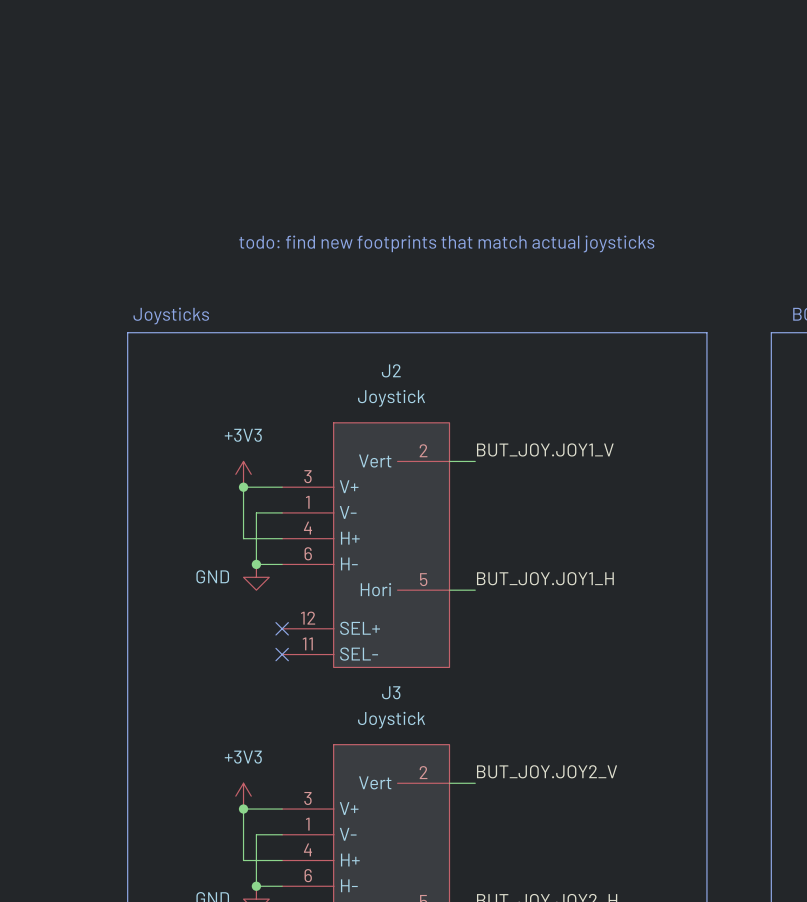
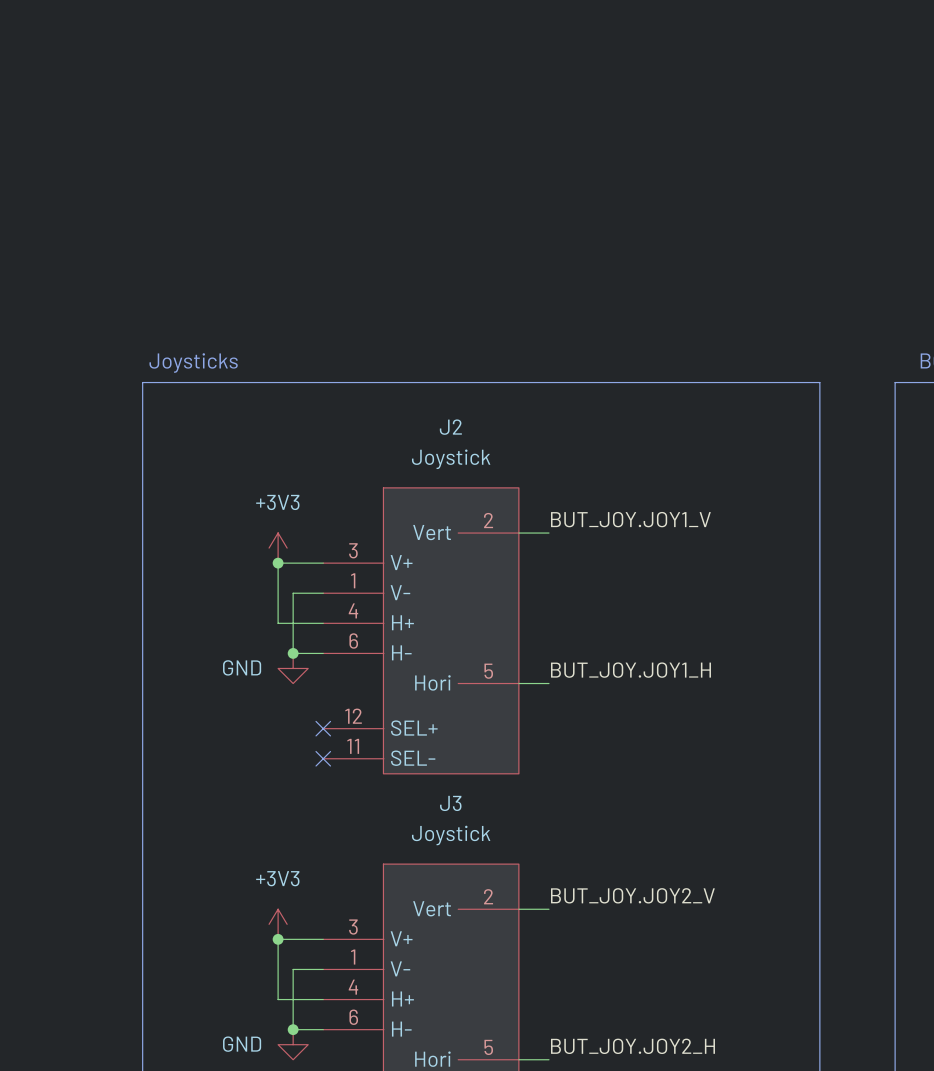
text: todo: find new footprints that match actual joysticks (446, 243) -> none

